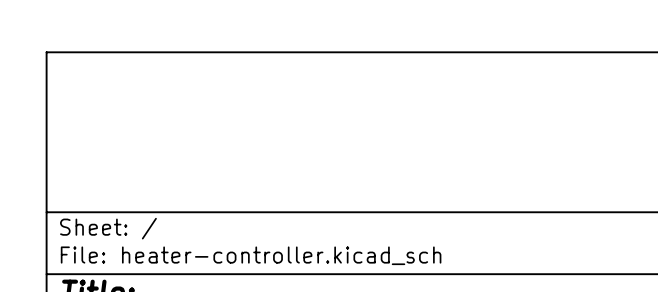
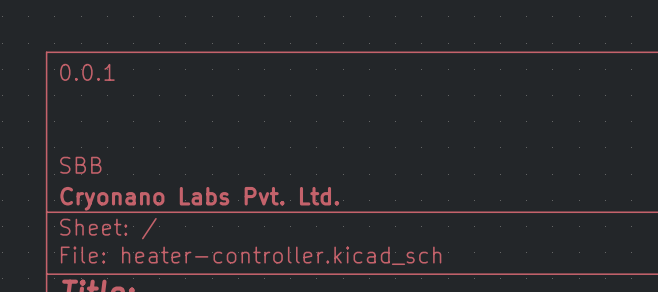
title block: none -> 0.0.1 (87, 72)
title block: none -> SBB (80, 165)
title block: none -> Cryonano Labs Pvt. Ltd. (199, 198)

